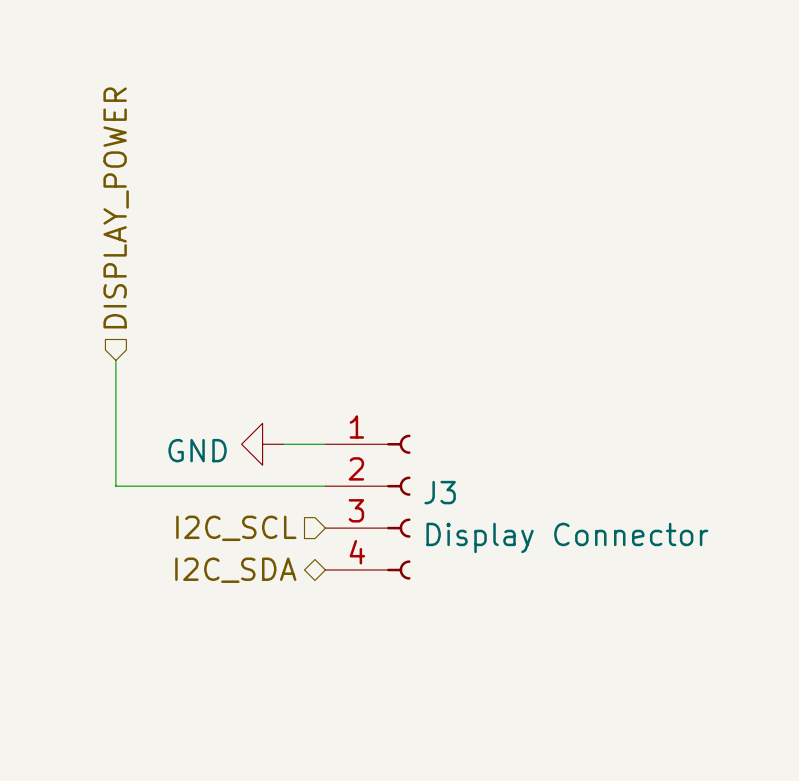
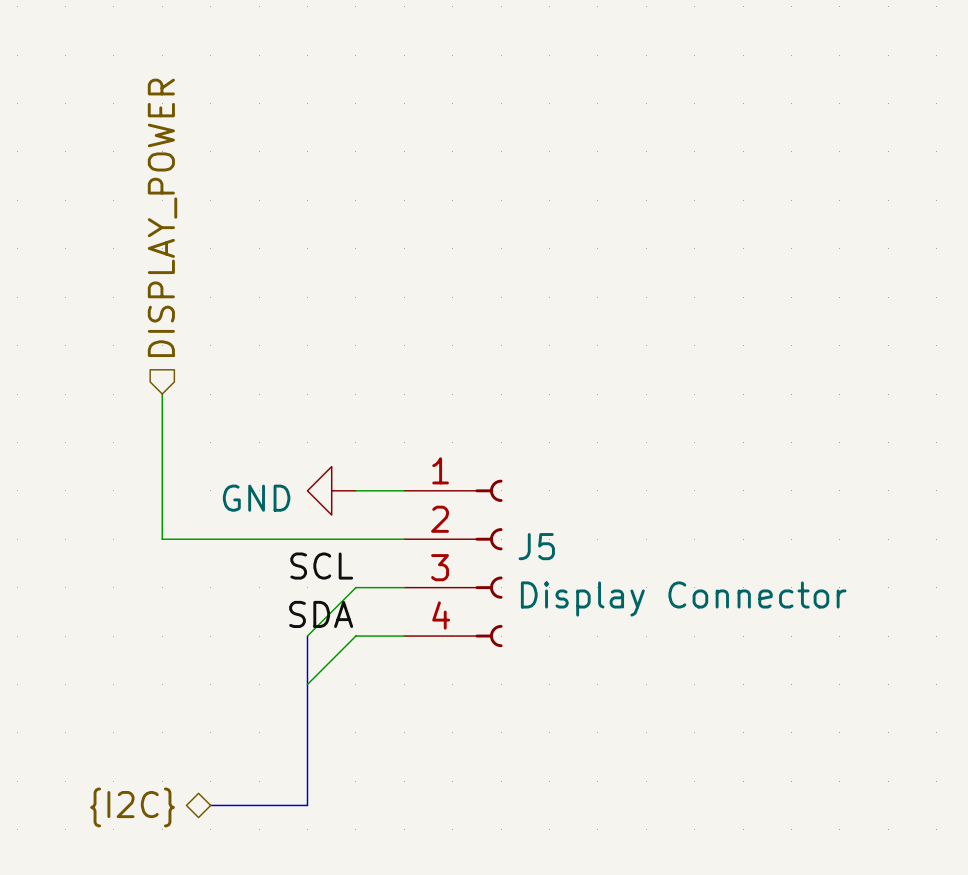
J3 name: J3 (440, 492) -> J5 (536, 546)
label: none -> SCL (321, 566)
hierarchical label: I2C_SCL (236, 528) -> none
wire: none -> (404, 587) (355, 587) (307, 636)
label: none -> SDA (321, 614)
hierarchical label: I2C_SDA (235, 570) -> none
bus: none -> (307, 636) (307, 805) (210, 805)
wire: none -> (404, 636) (355, 636) (307, 684)
hierarchical label: none -> {I2C} (132, 807)

